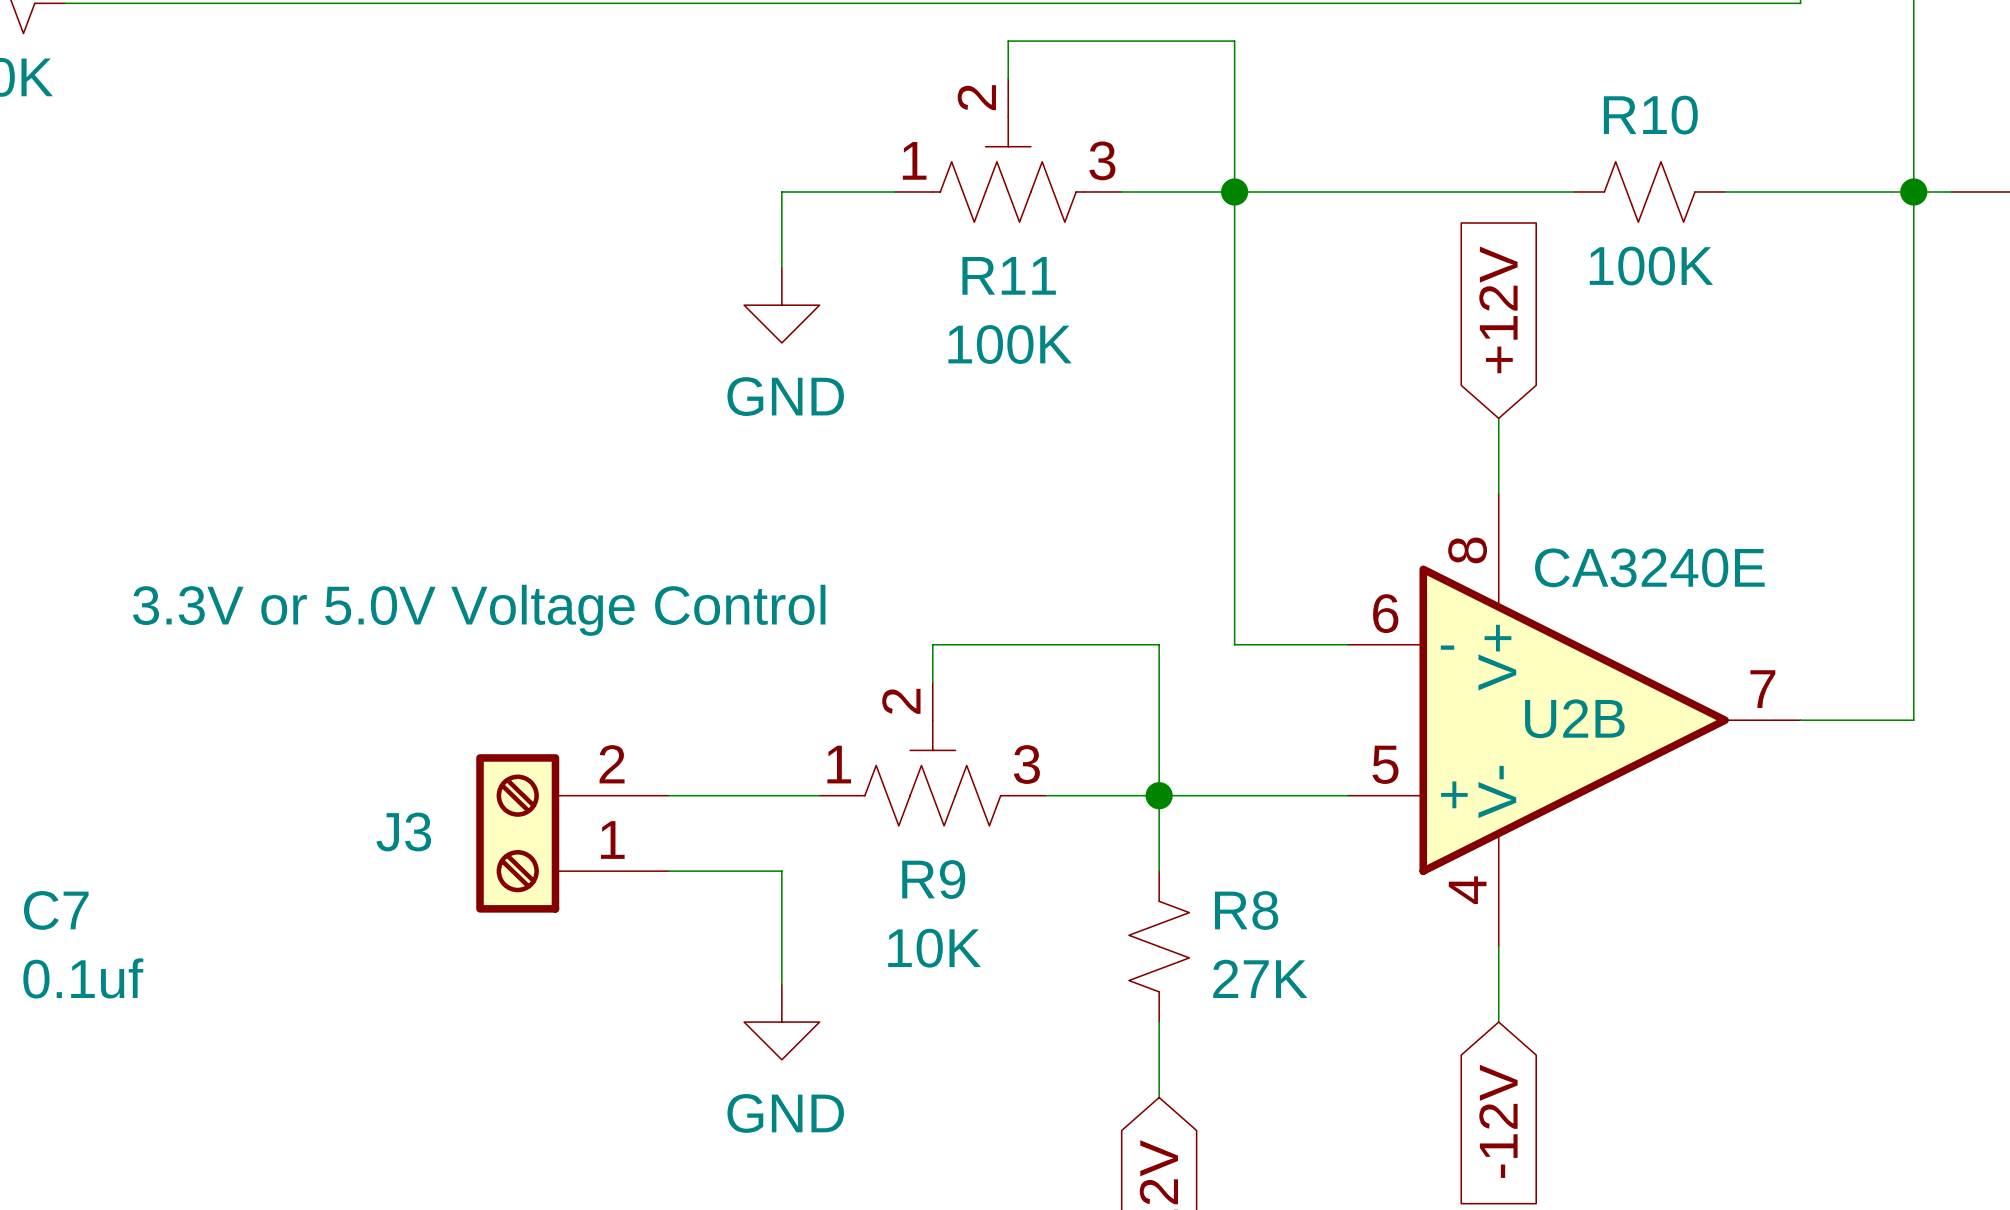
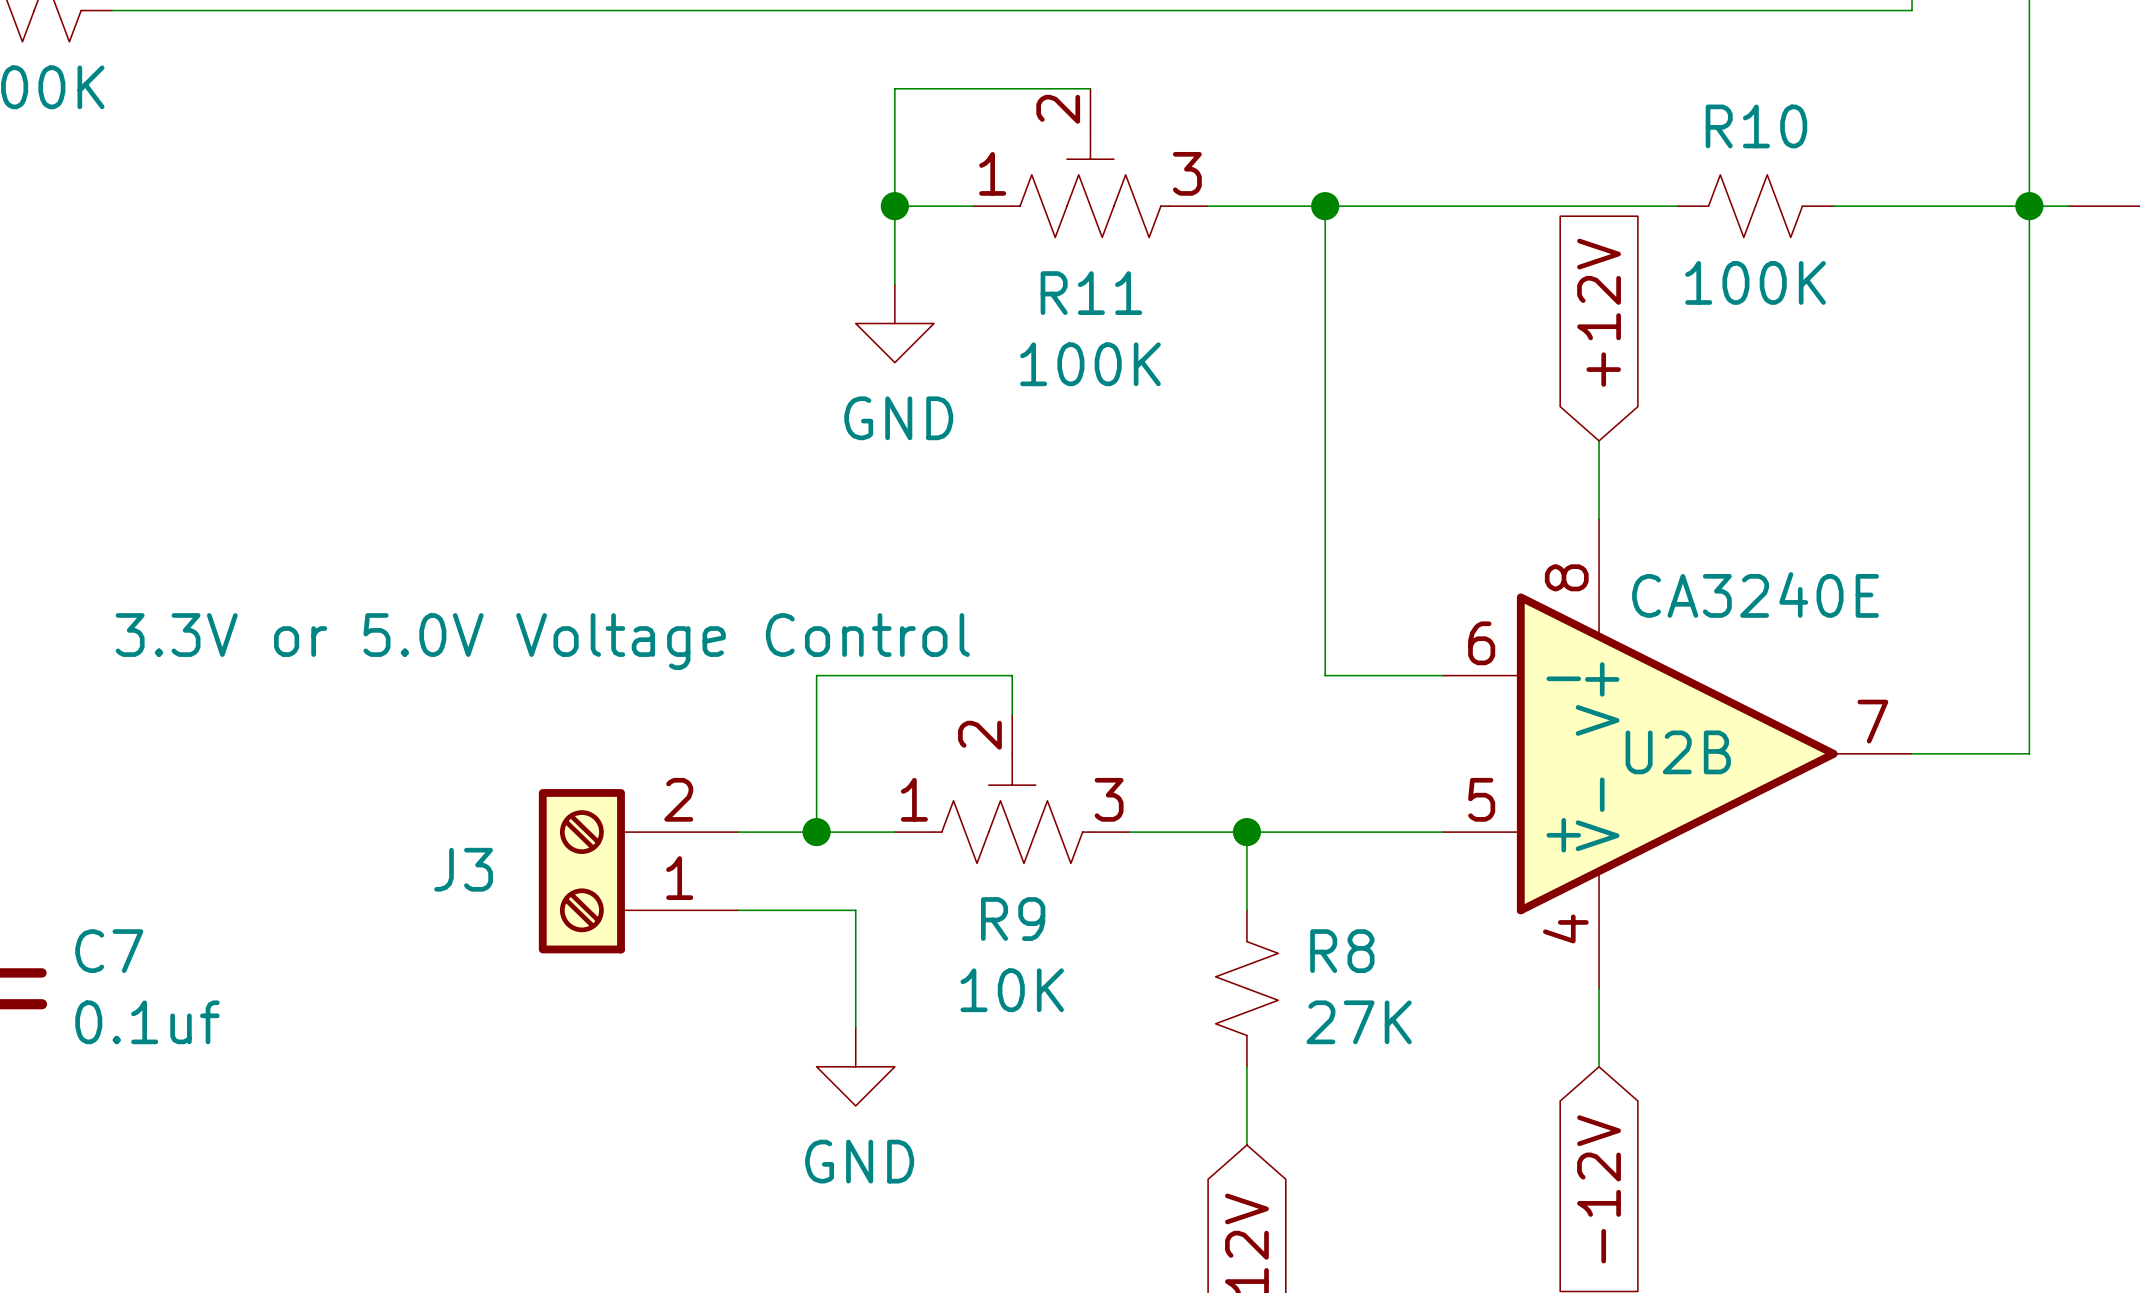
wire: (1008, 78) (1008, 41) (1234, 41) (1234, 191) -> (1090, 88) (894, 88) (894, 284)
wire: (819, 191) (781, 191) (781, 267) -> none
junction: none -> (894, 206)
power symbol position: GND (781, 305) -> GND (894, 323)
wire: (932, 644) (1159, 644) (1159, 795) -> (1012, 675) (816, 675) (816, 832)
junction: none -> (816, 832)

